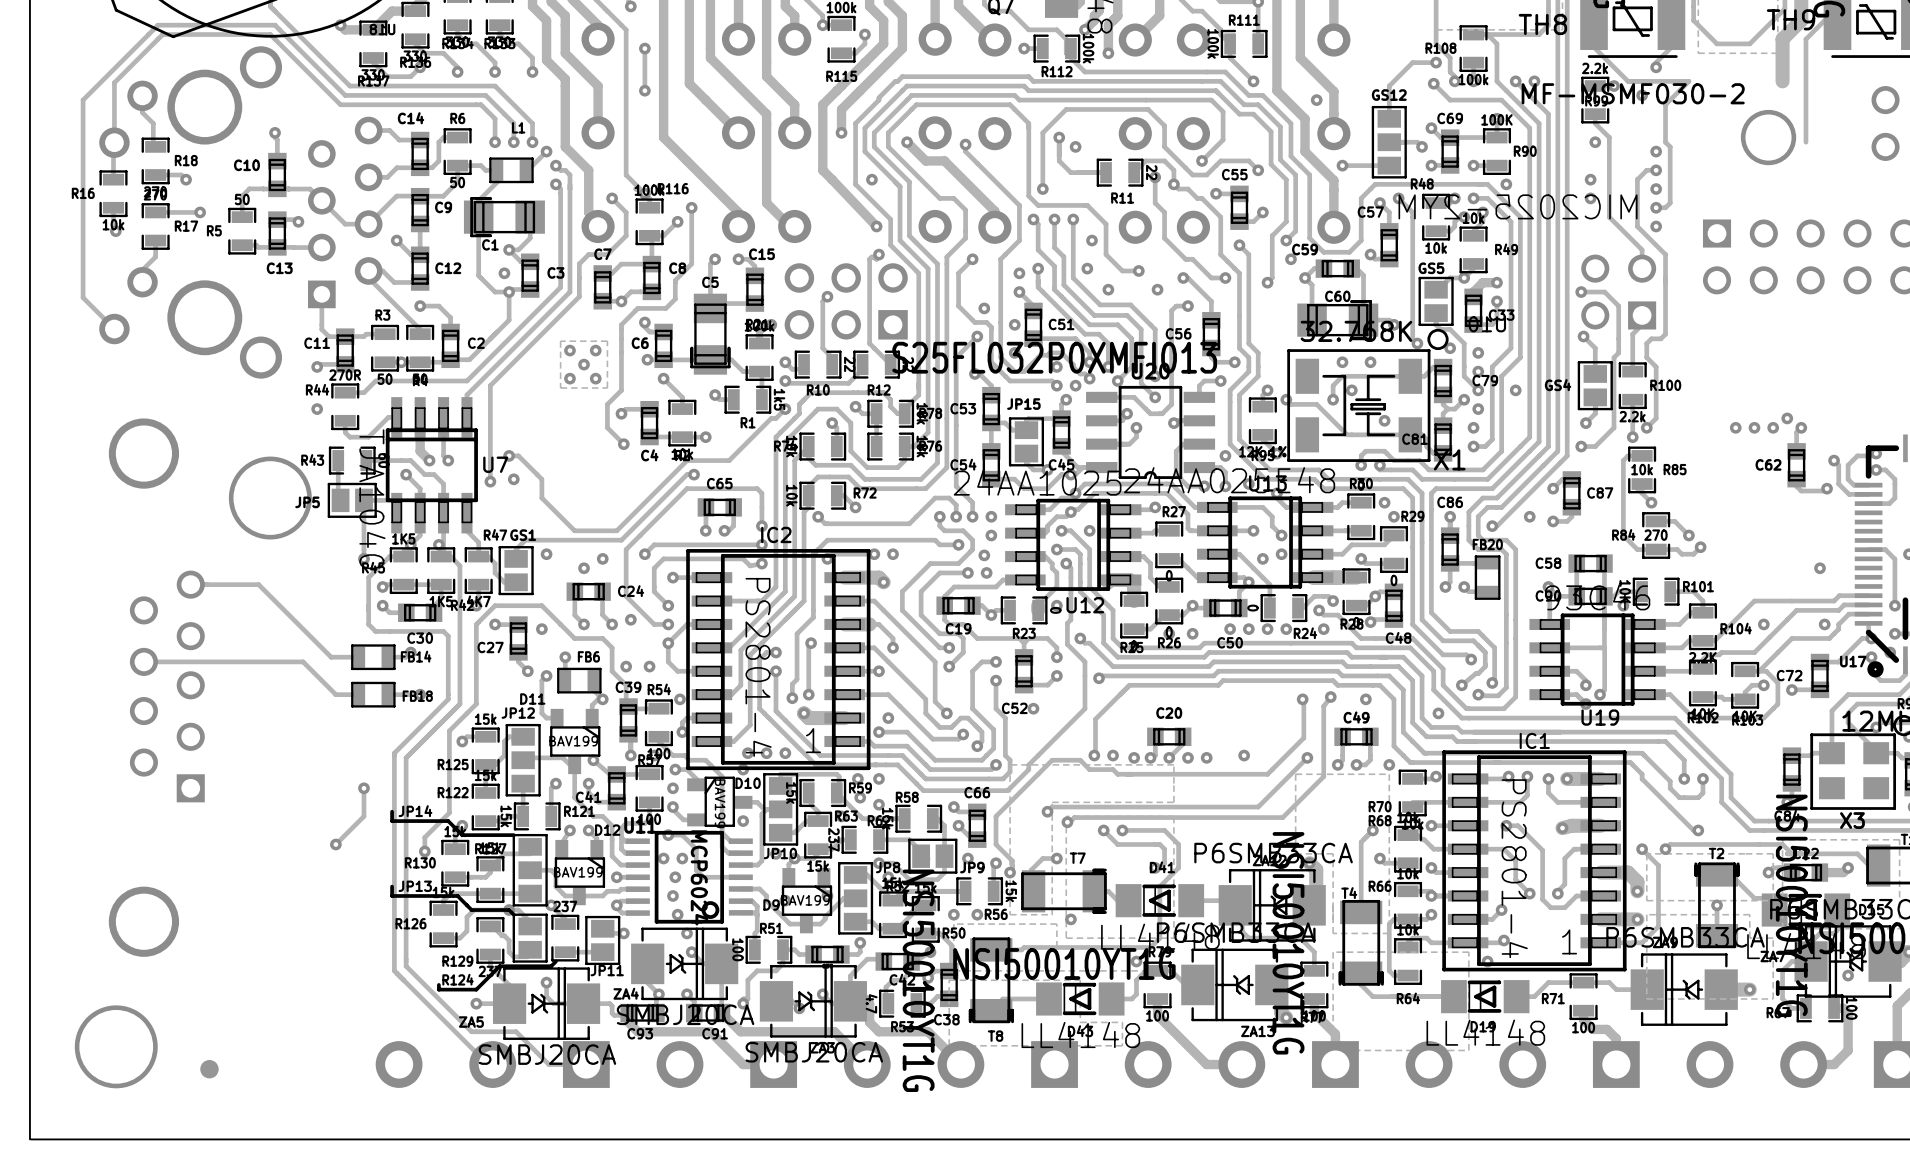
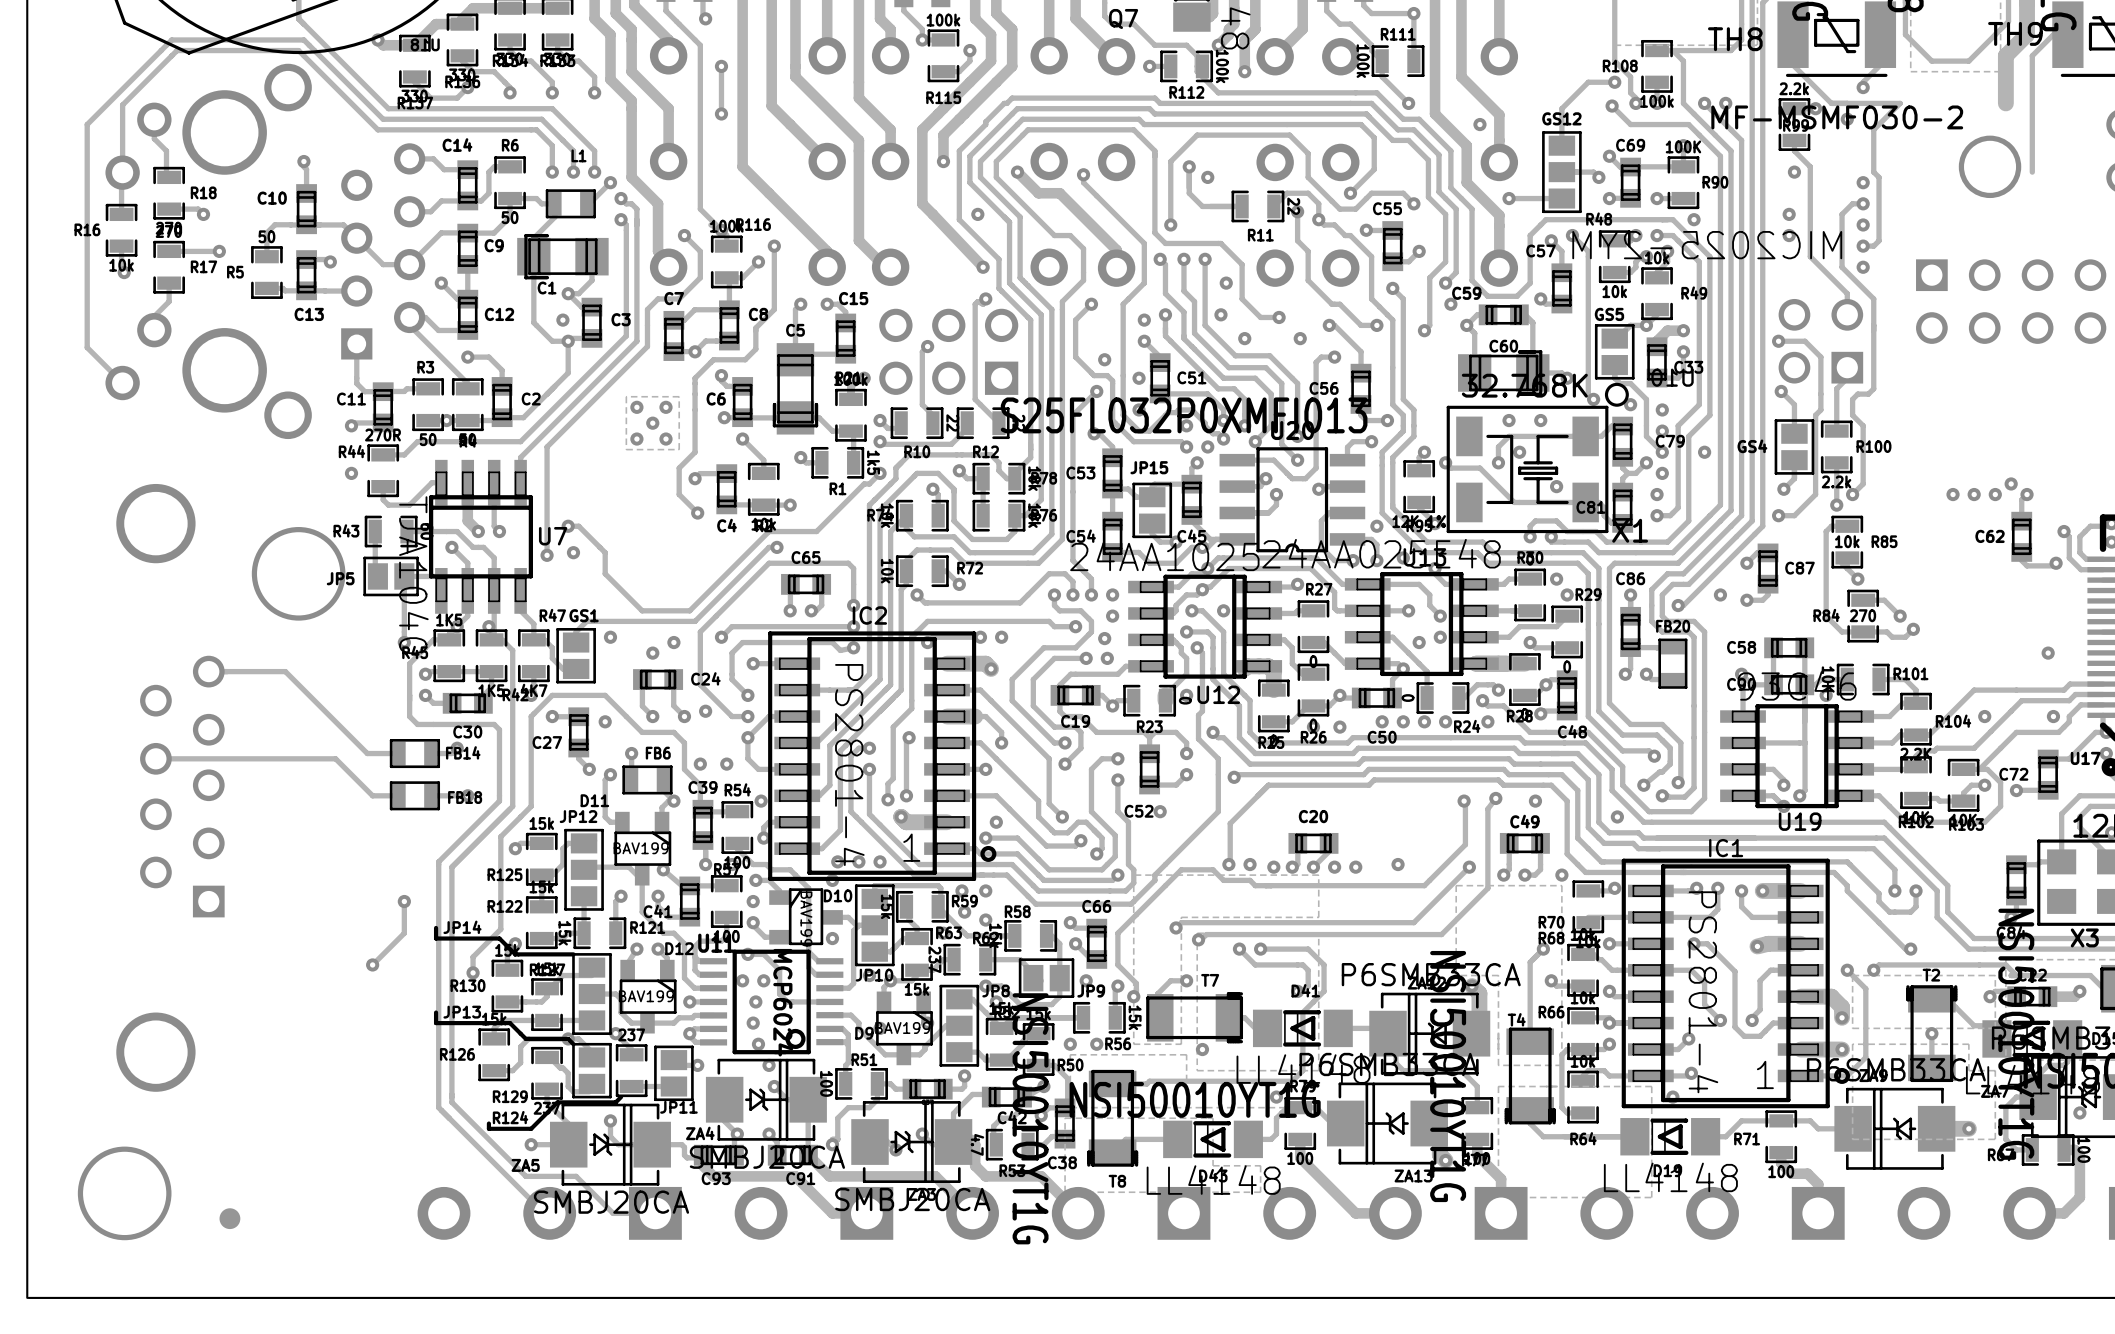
drawing: none -> [980, 845, 997, 862]
drawing: none -> [1834, 1067, 1851, 1084]

